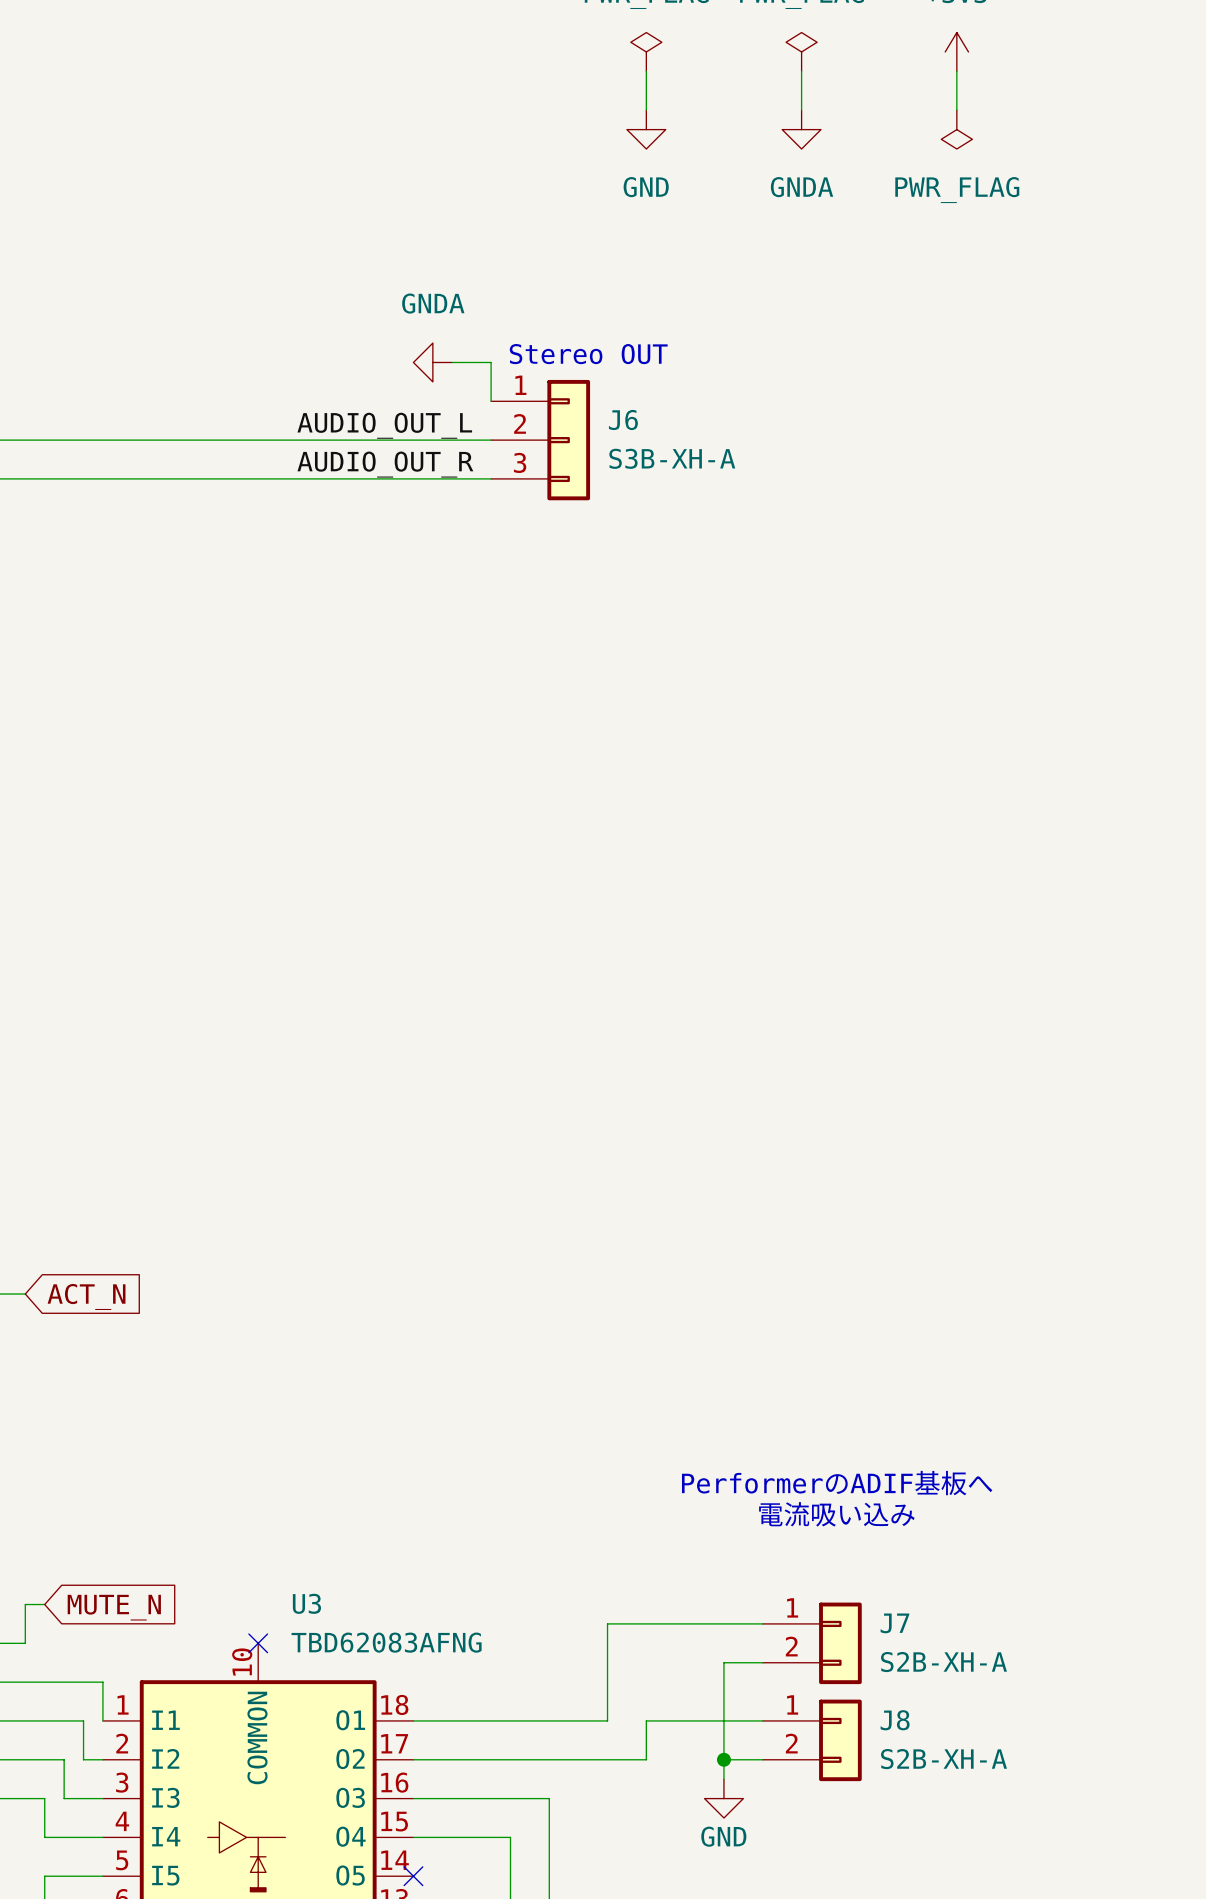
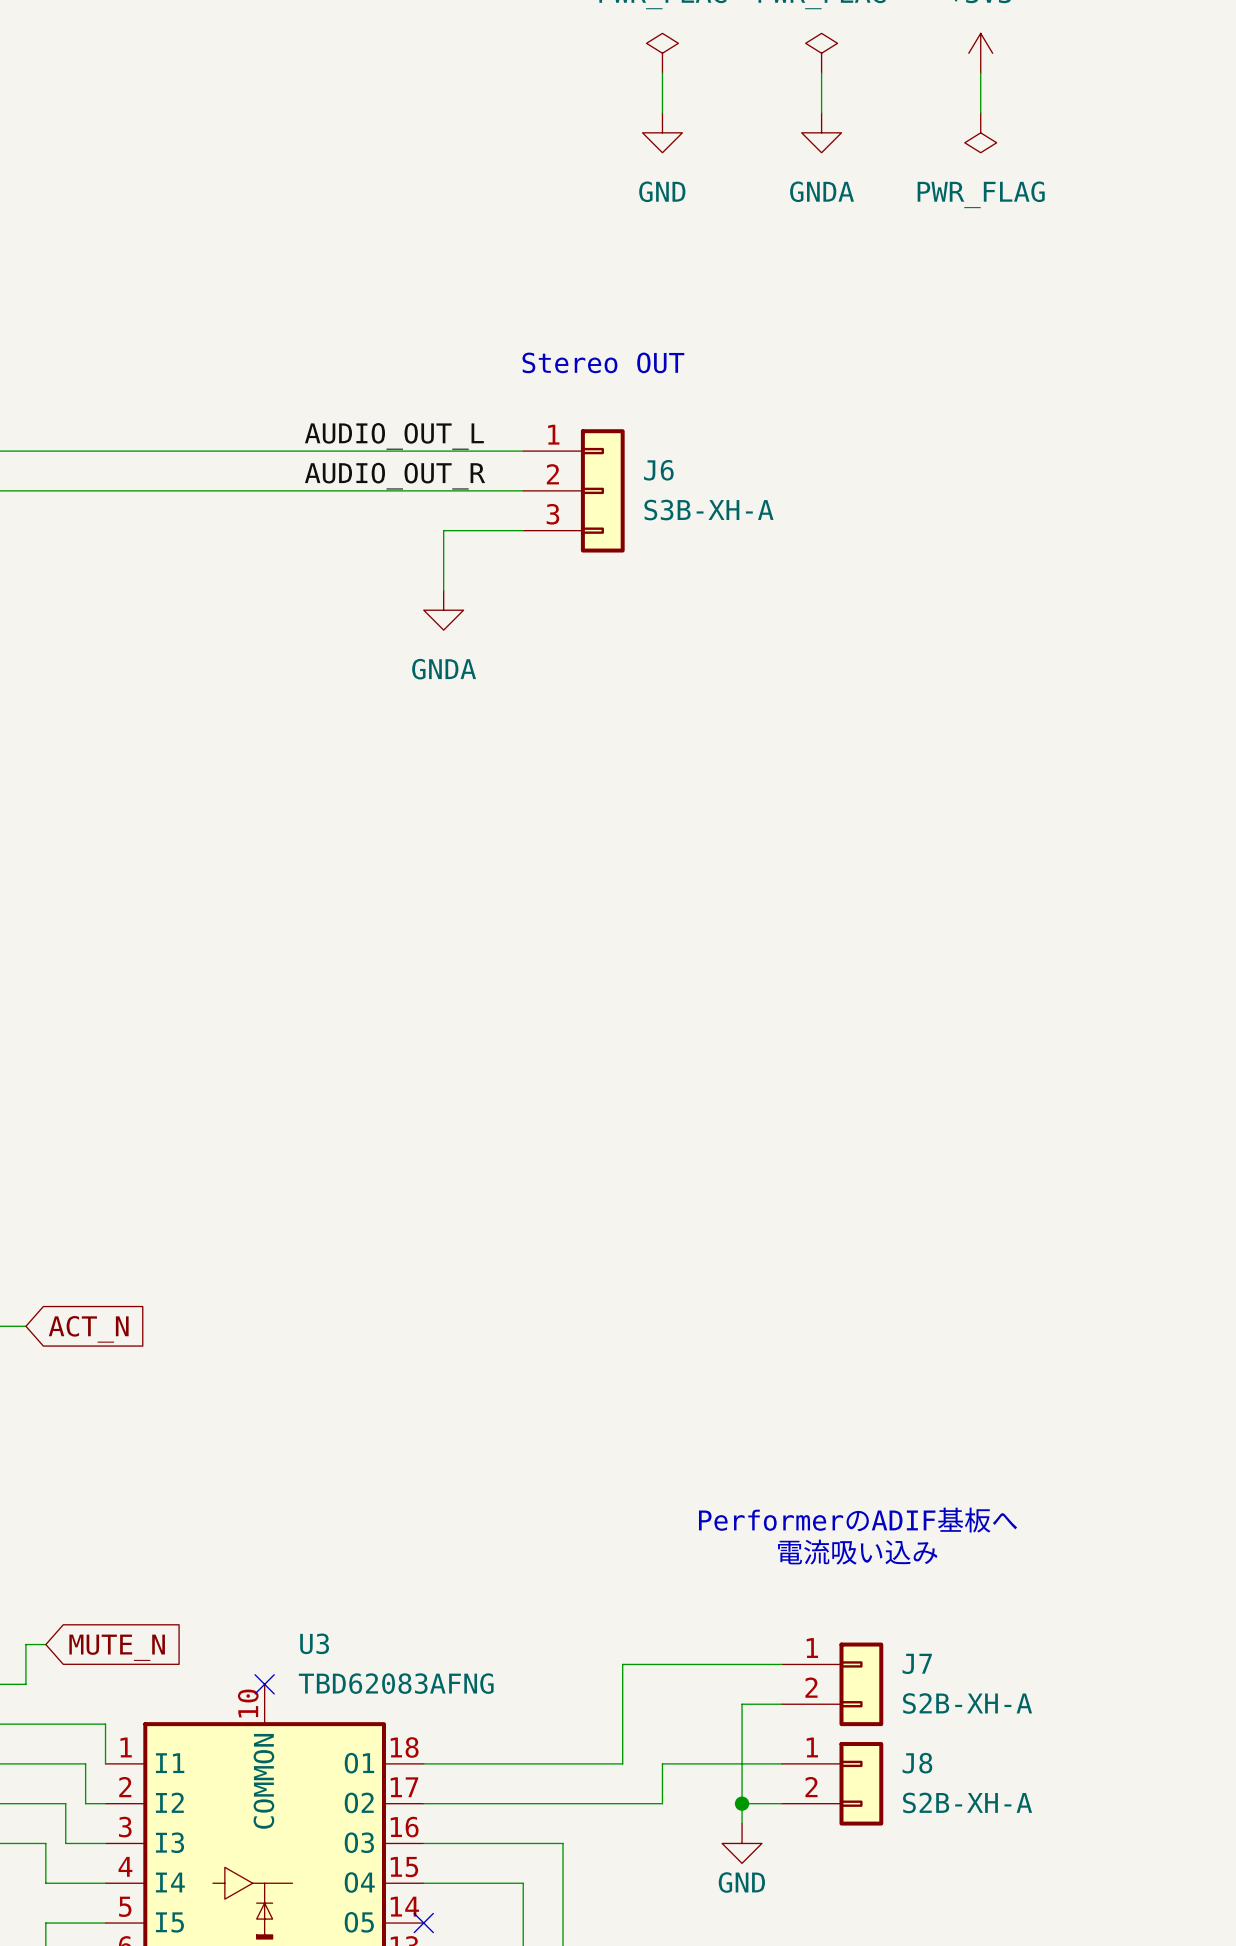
power symbol text position: GNDA (433, 303) -> GNDA (444, 669)
power symbol rotation: 0° (432, 362) -> 90° counterclockwise (443, 610)
power symbol position: GNDA (432, 362) -> GNDA (443, 610)
wire: (452, 362) (491, 362) (491, 401) -> none
J6 position: (540, 440) -> (573, 490)
wire: none -> (523, 530) (443, 530) (443, 590)

